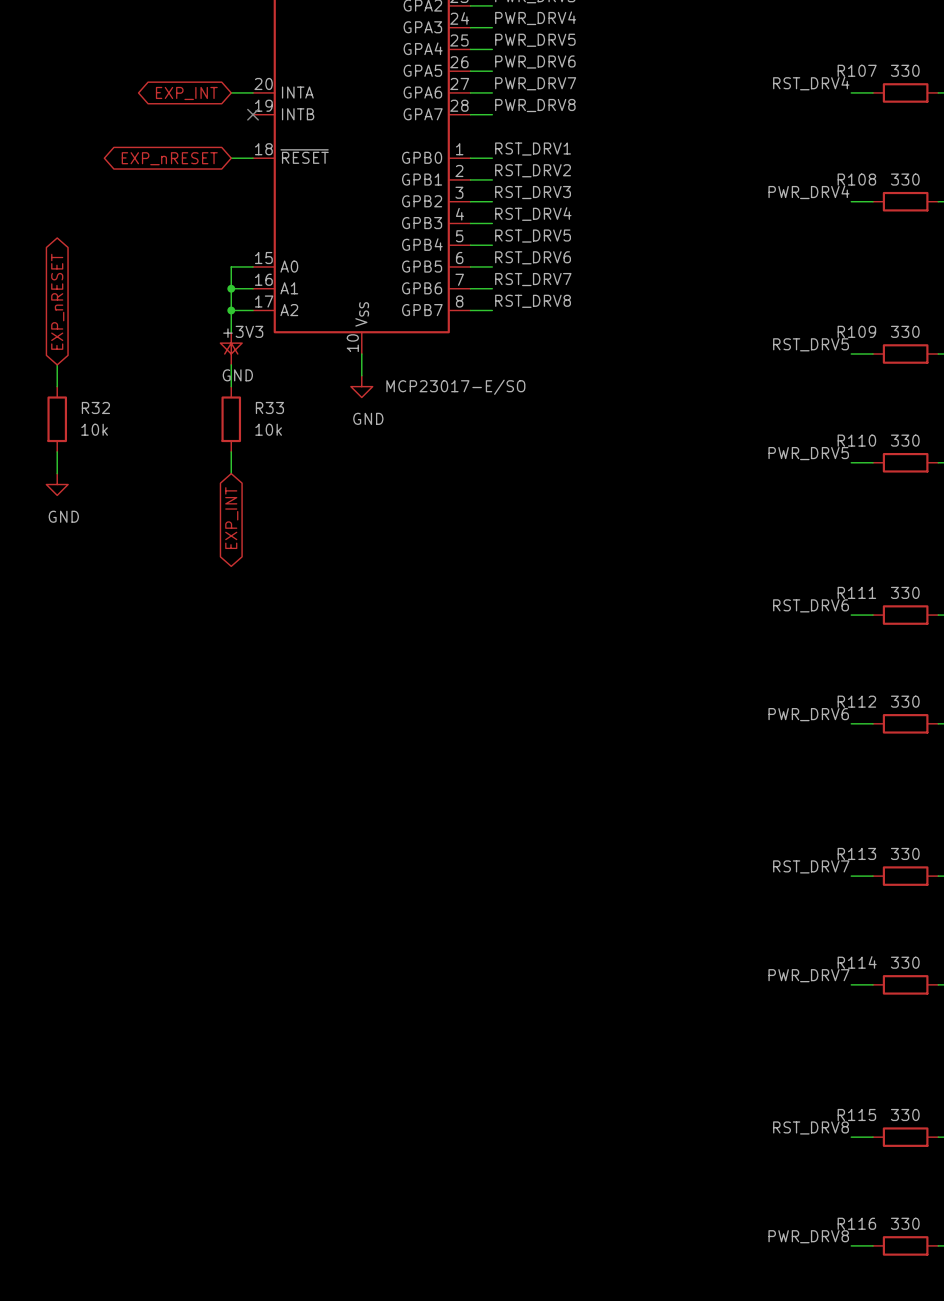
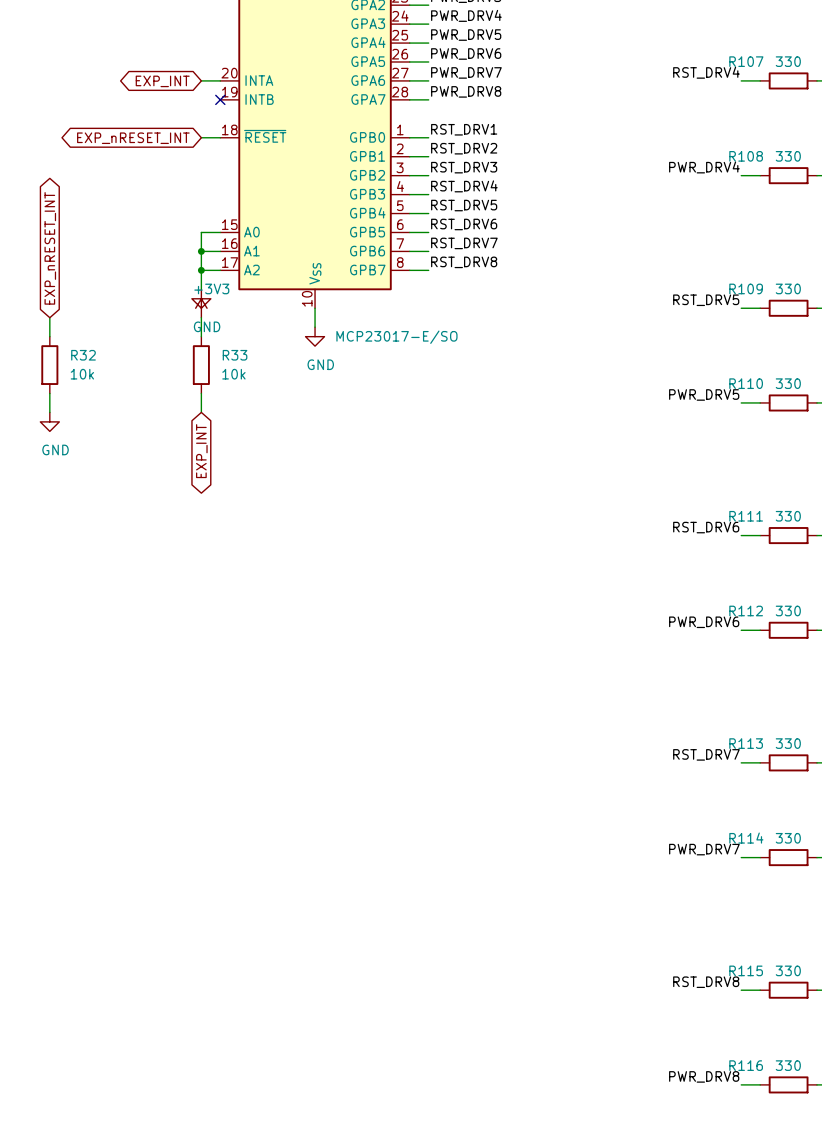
global label: EXP_nRESET (169, 158) -> EXP_nRESET_INT (133, 138)
global label: EXP_nRESET (57, 301) -> EXP_nRESET_INT (50, 248)

